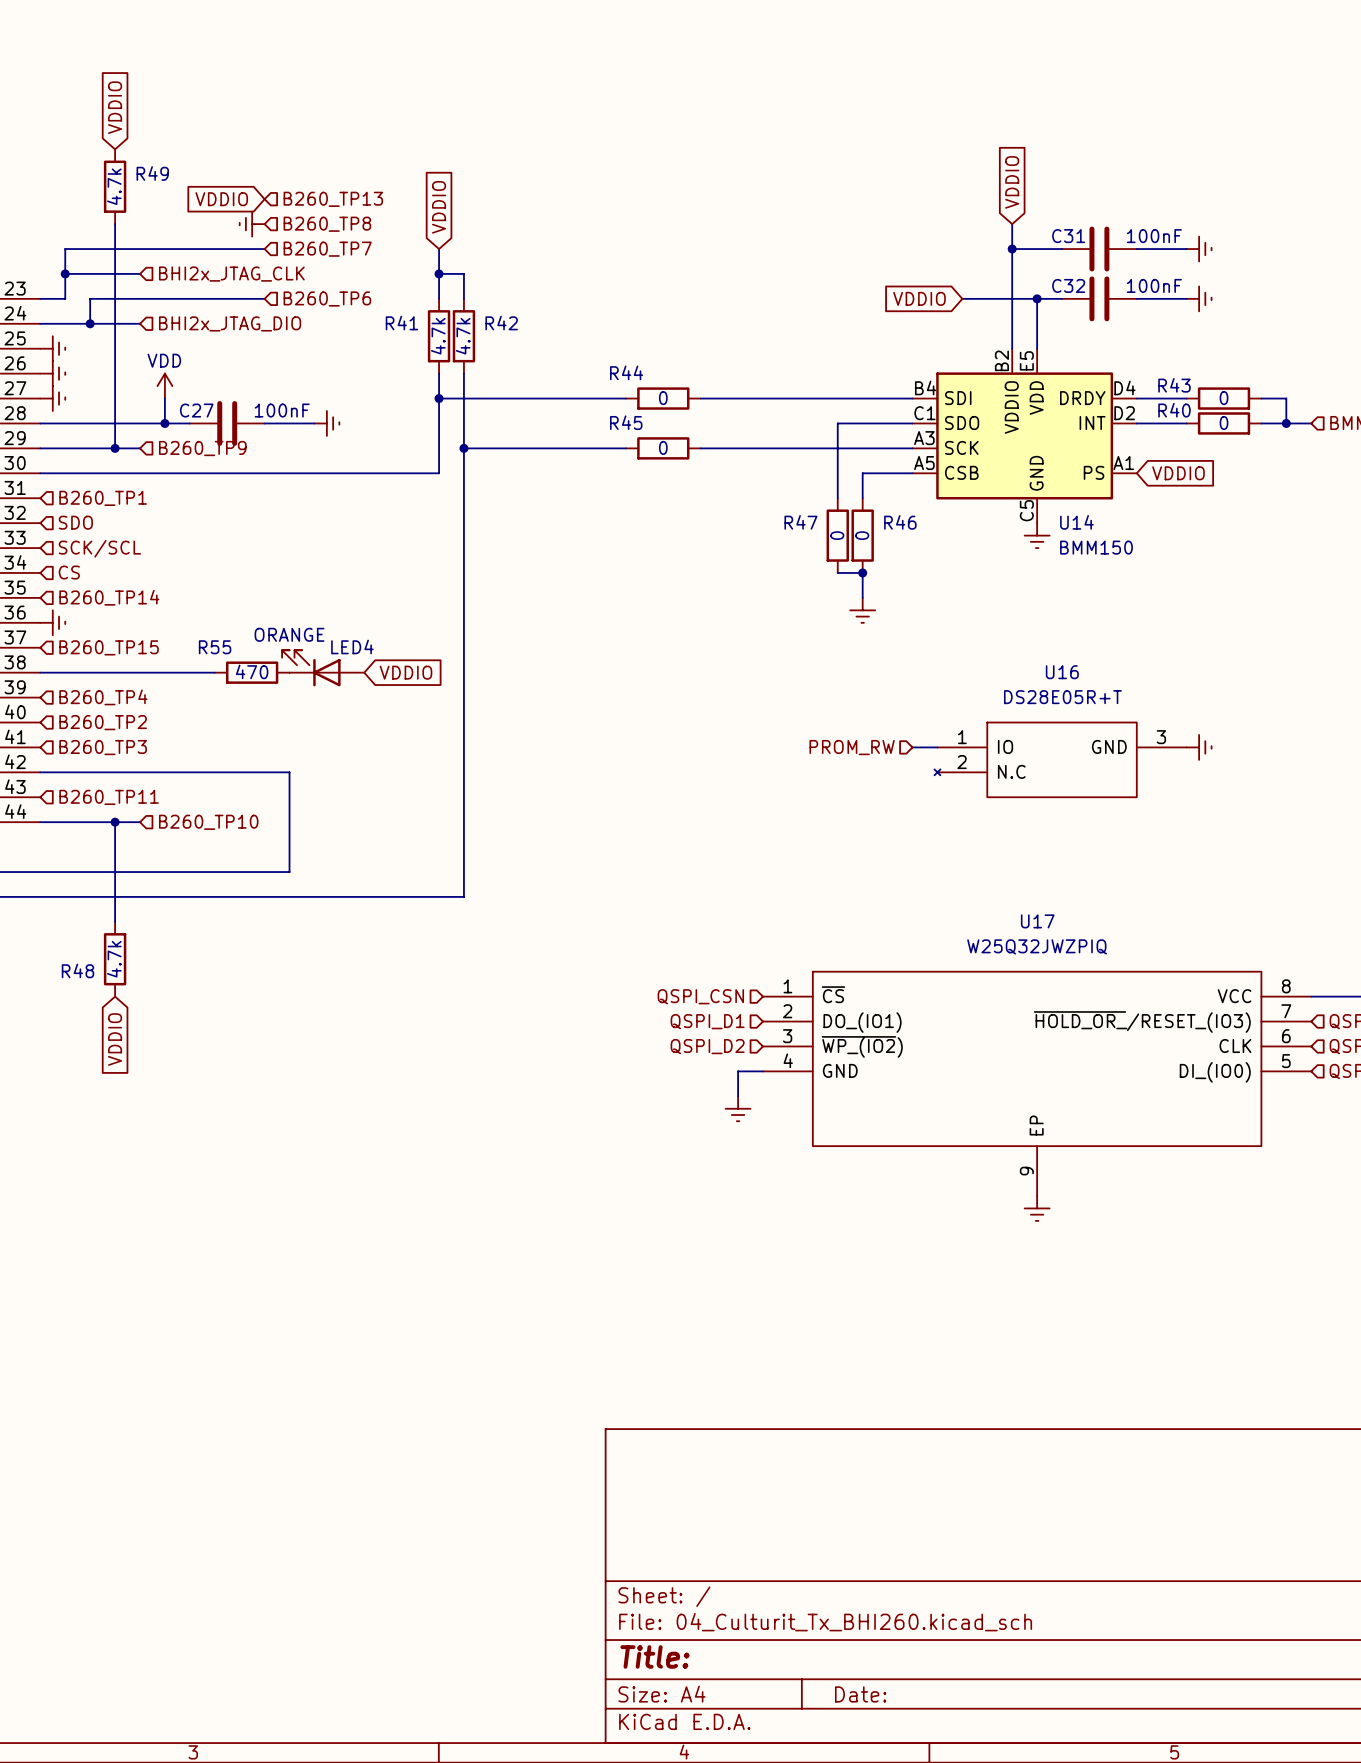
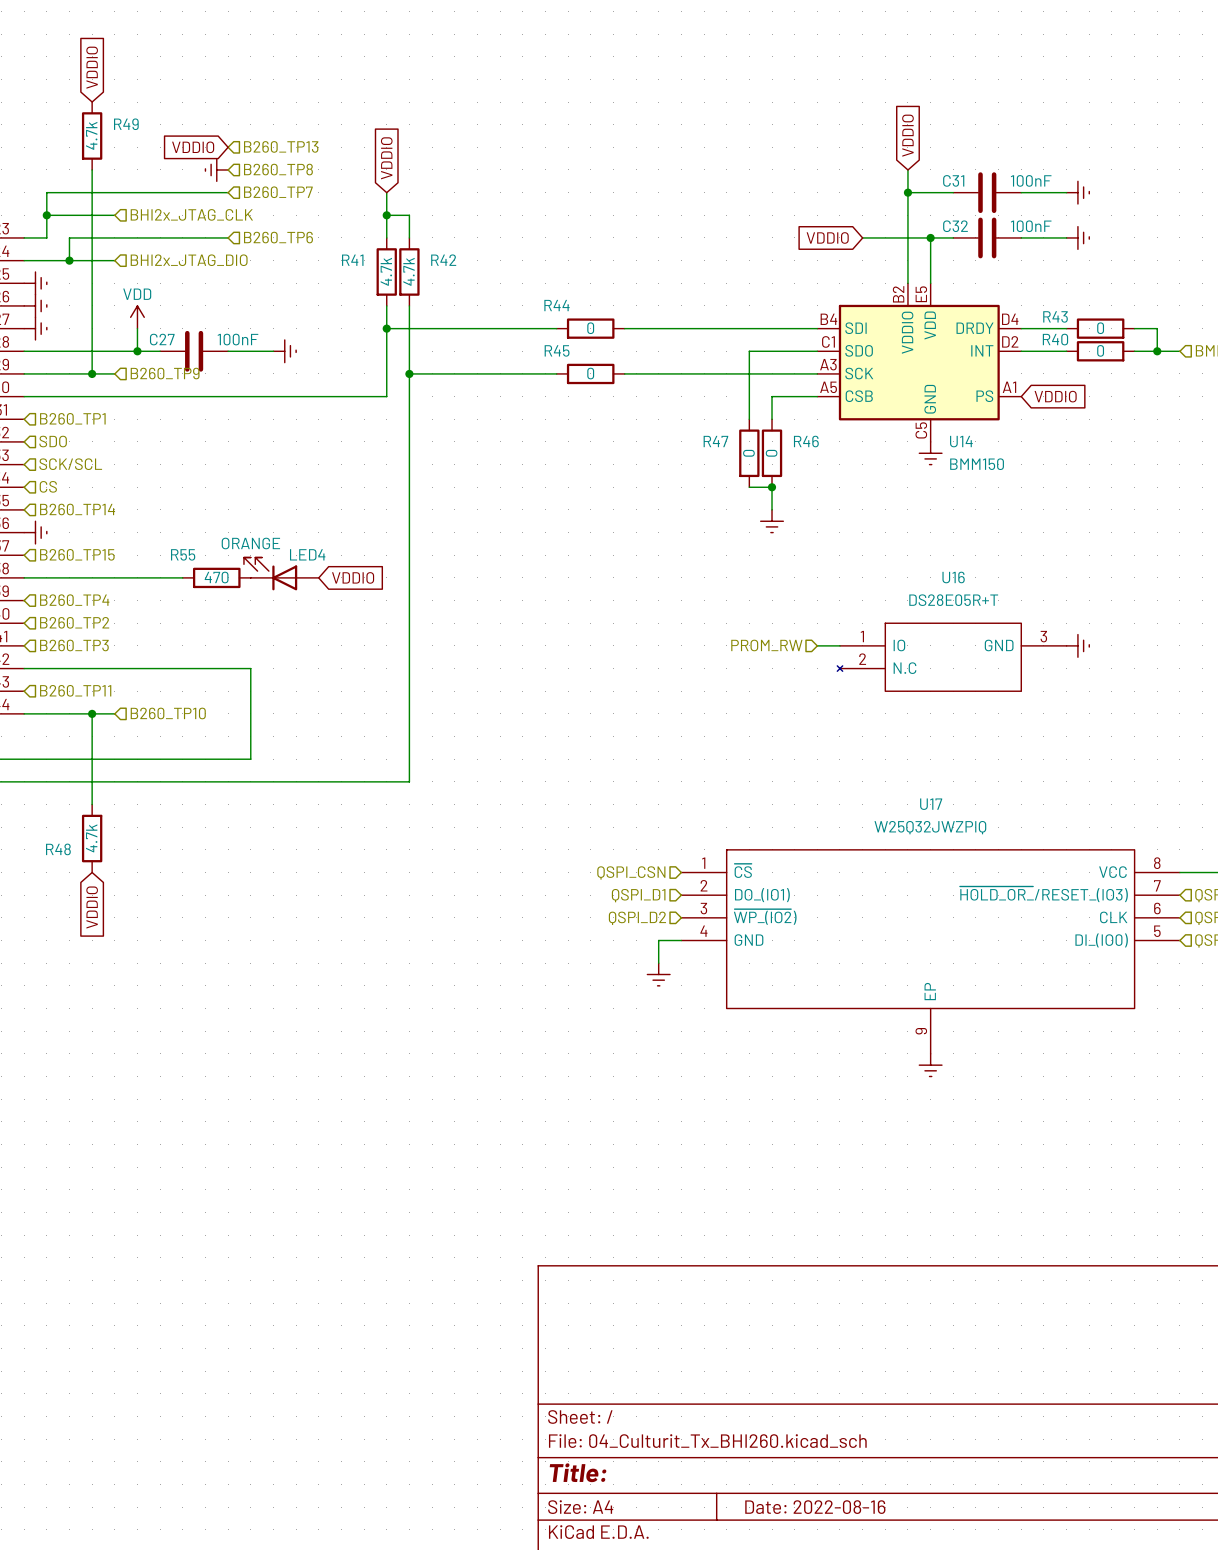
title block: Date: (860, 1694) -> Date: 2022-08-16 (815, 1507)

